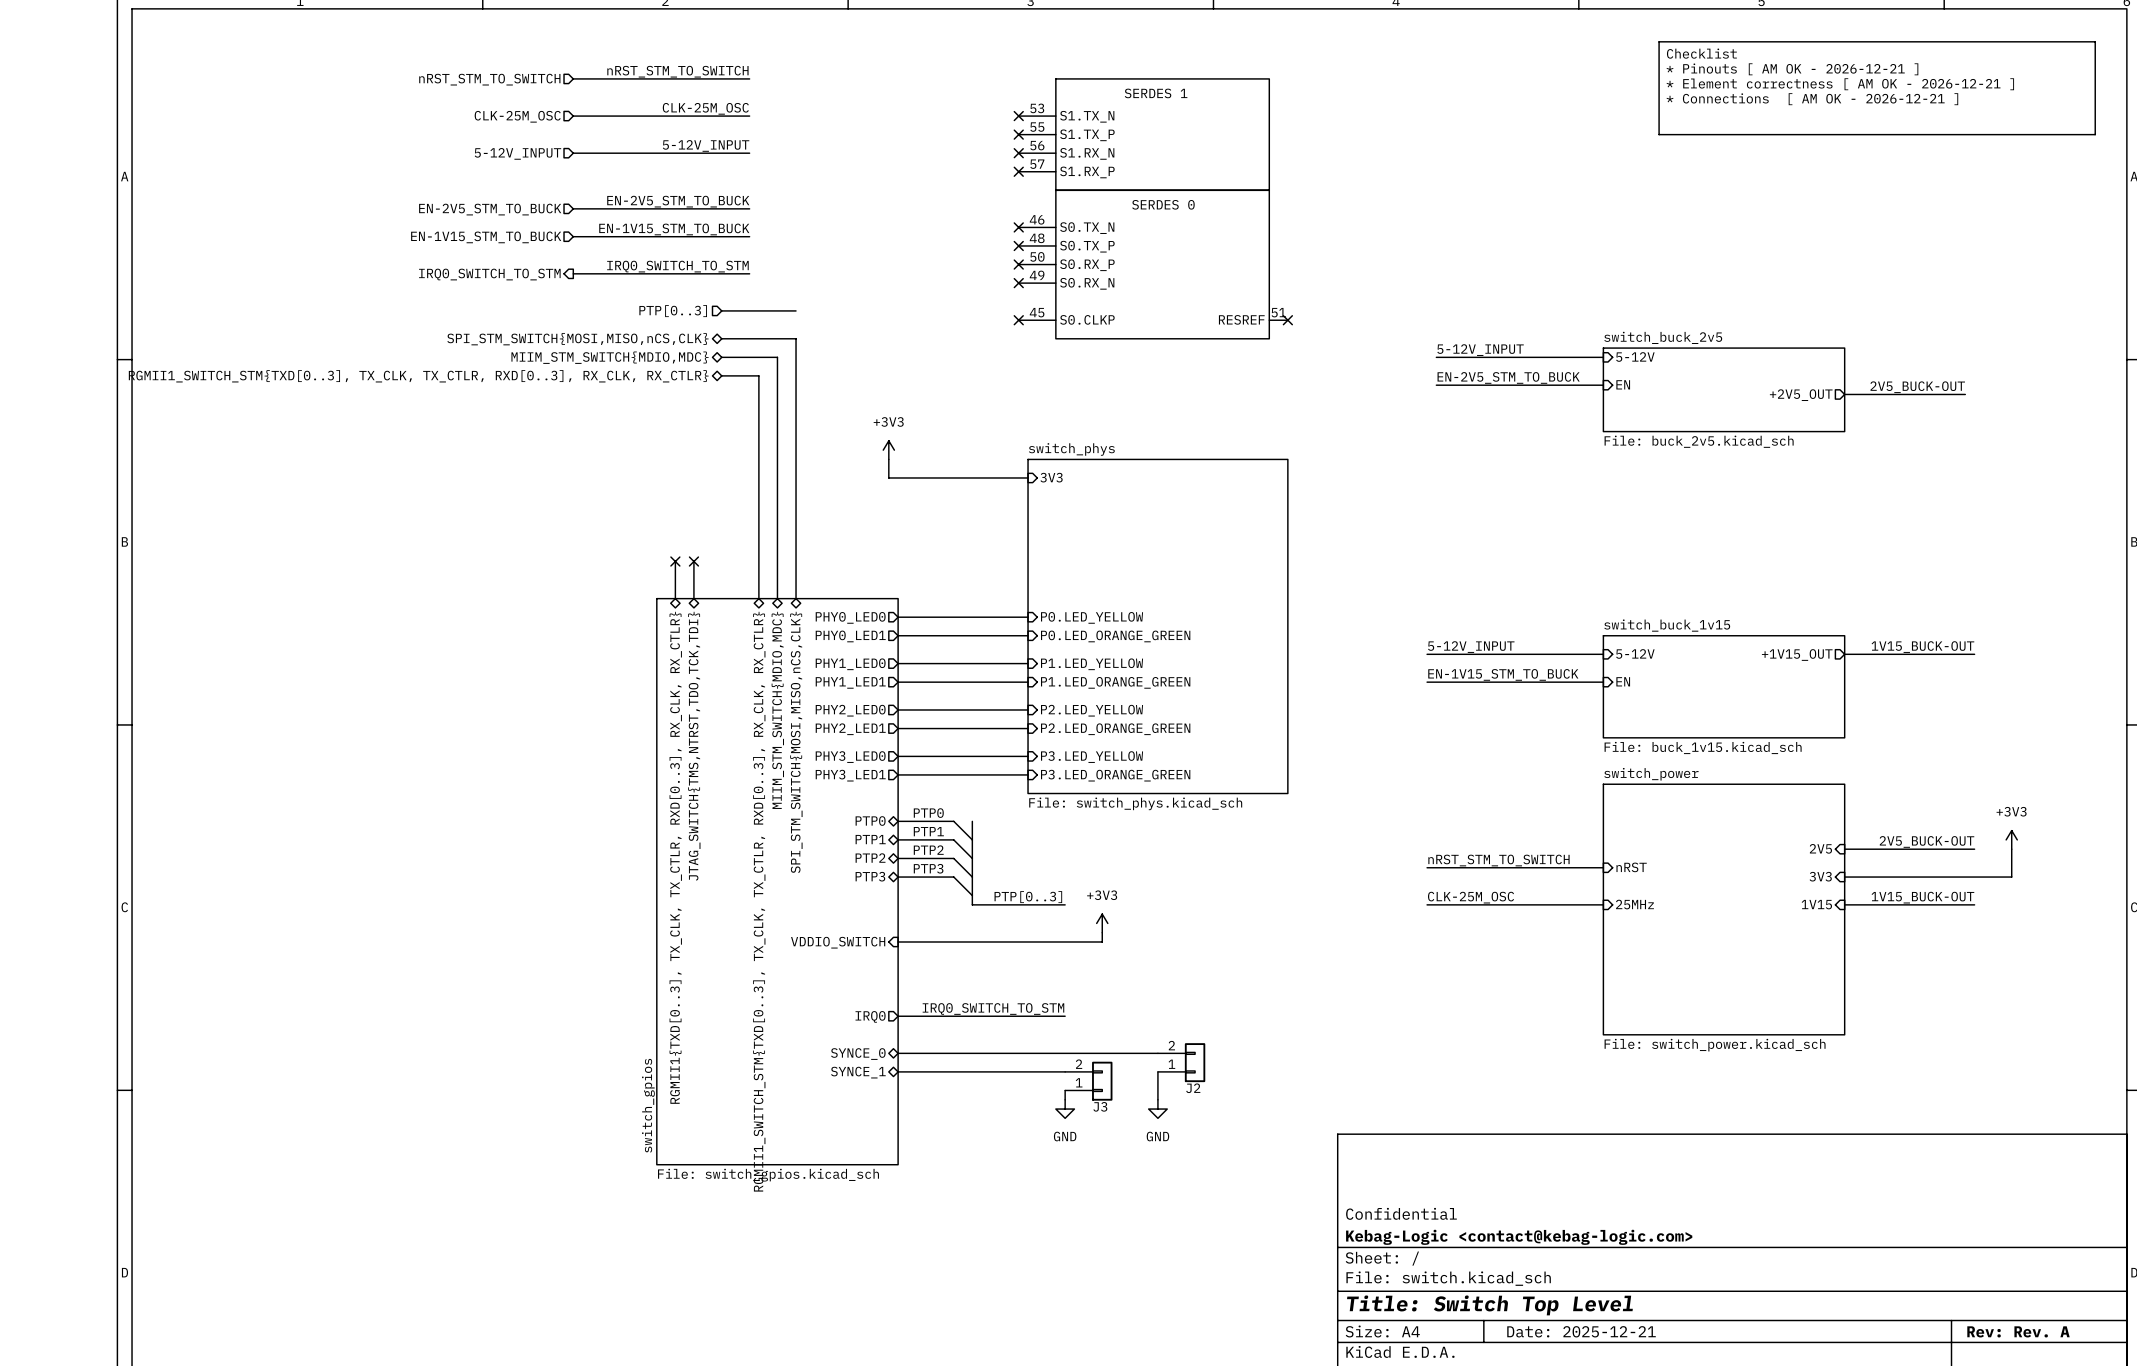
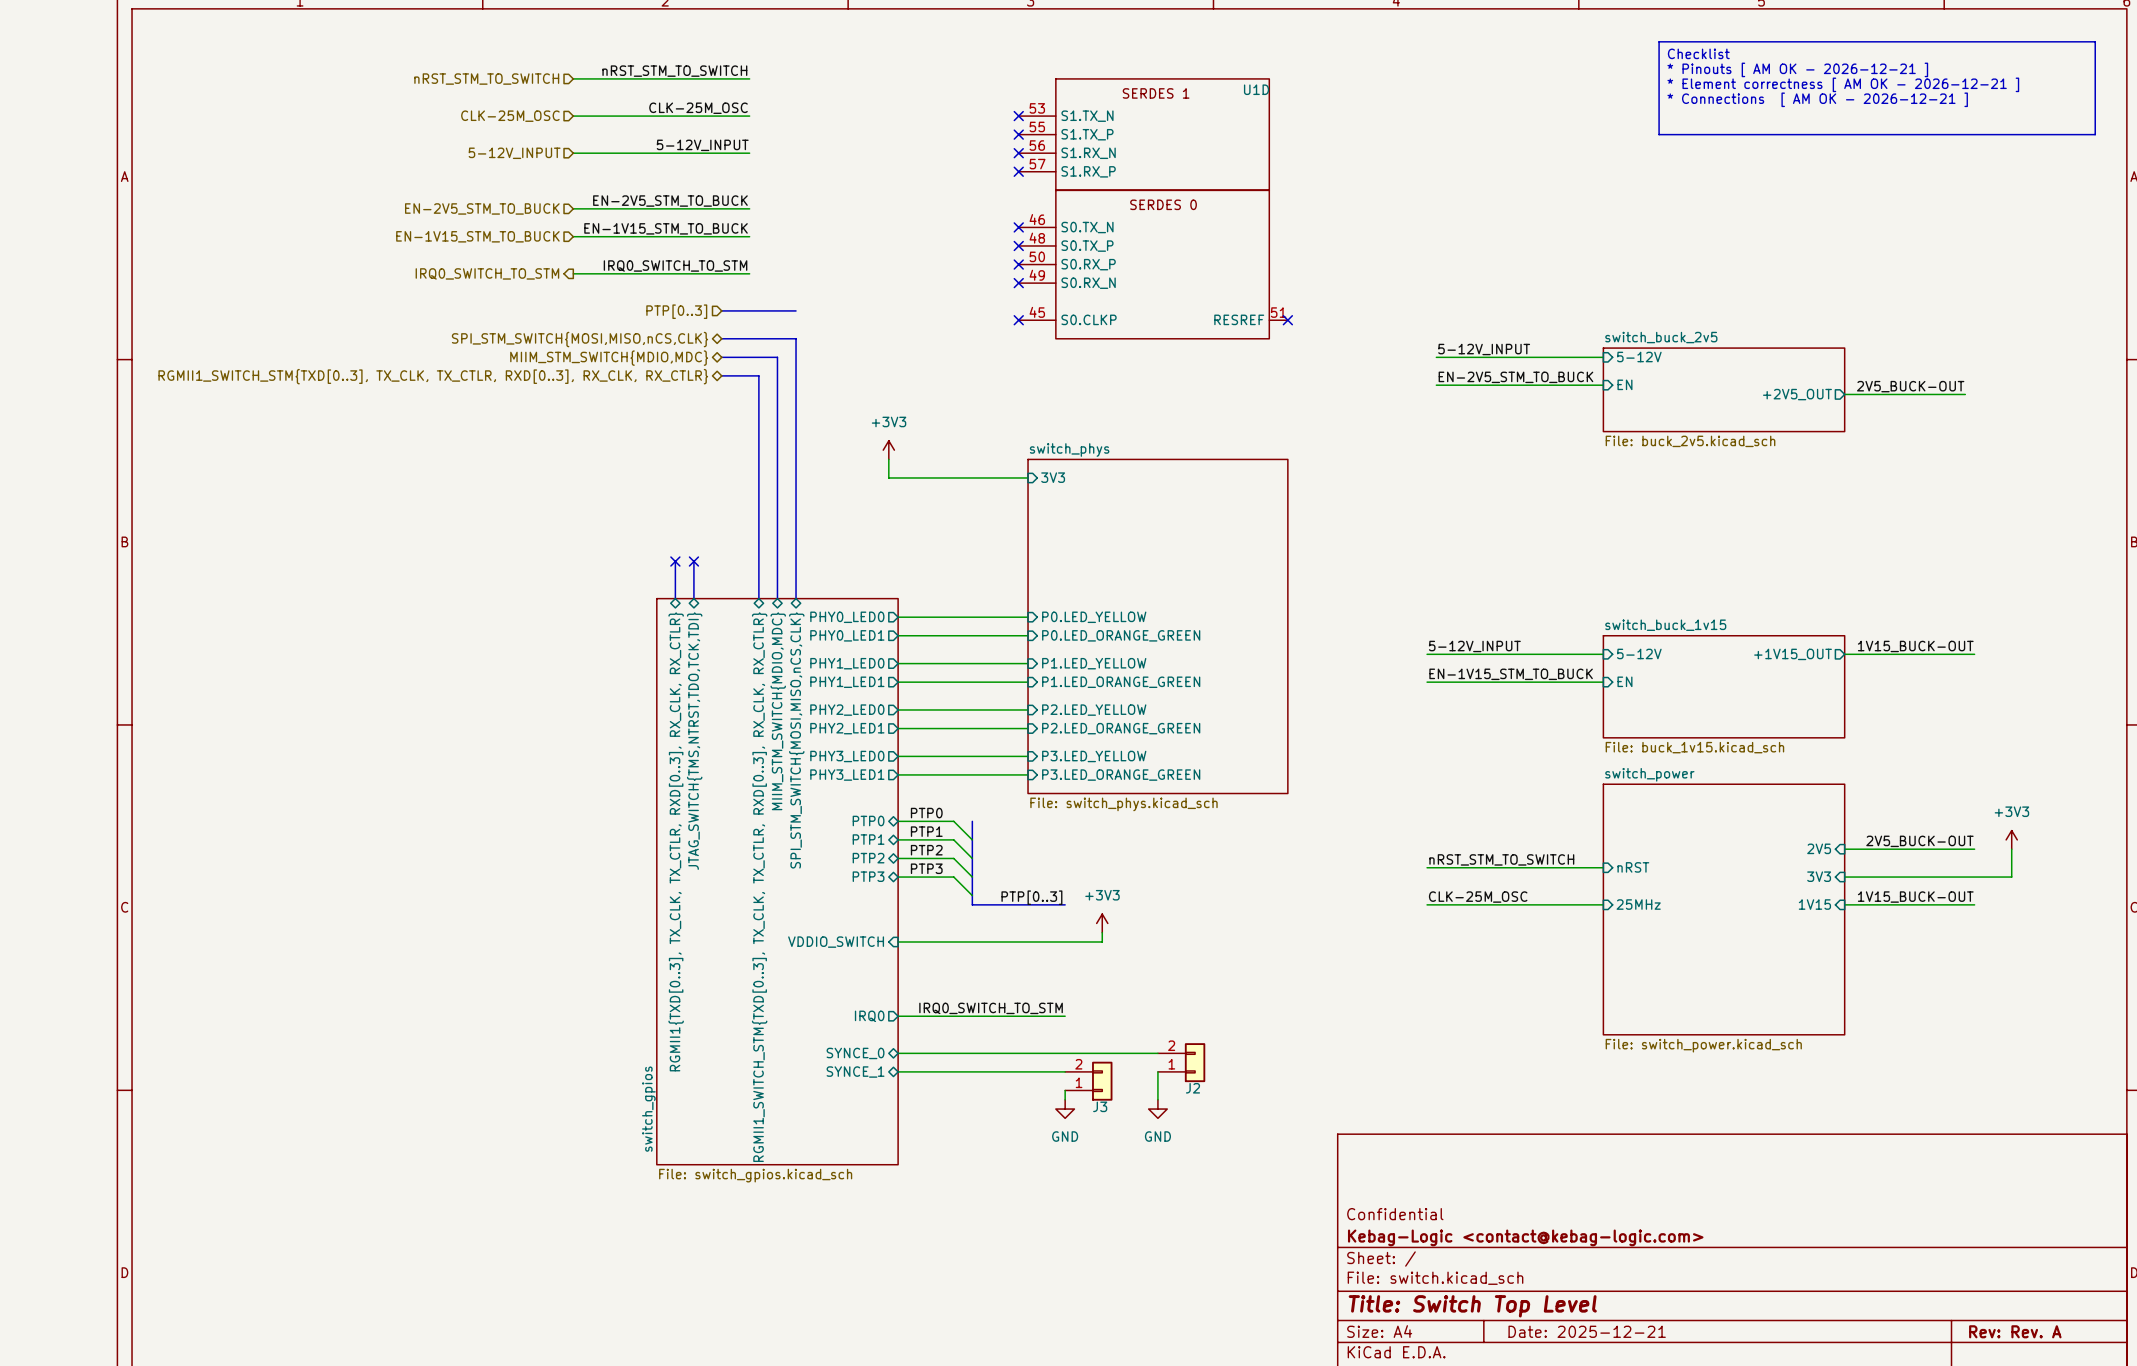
U1D name: none -> U1D (1256, 89)

